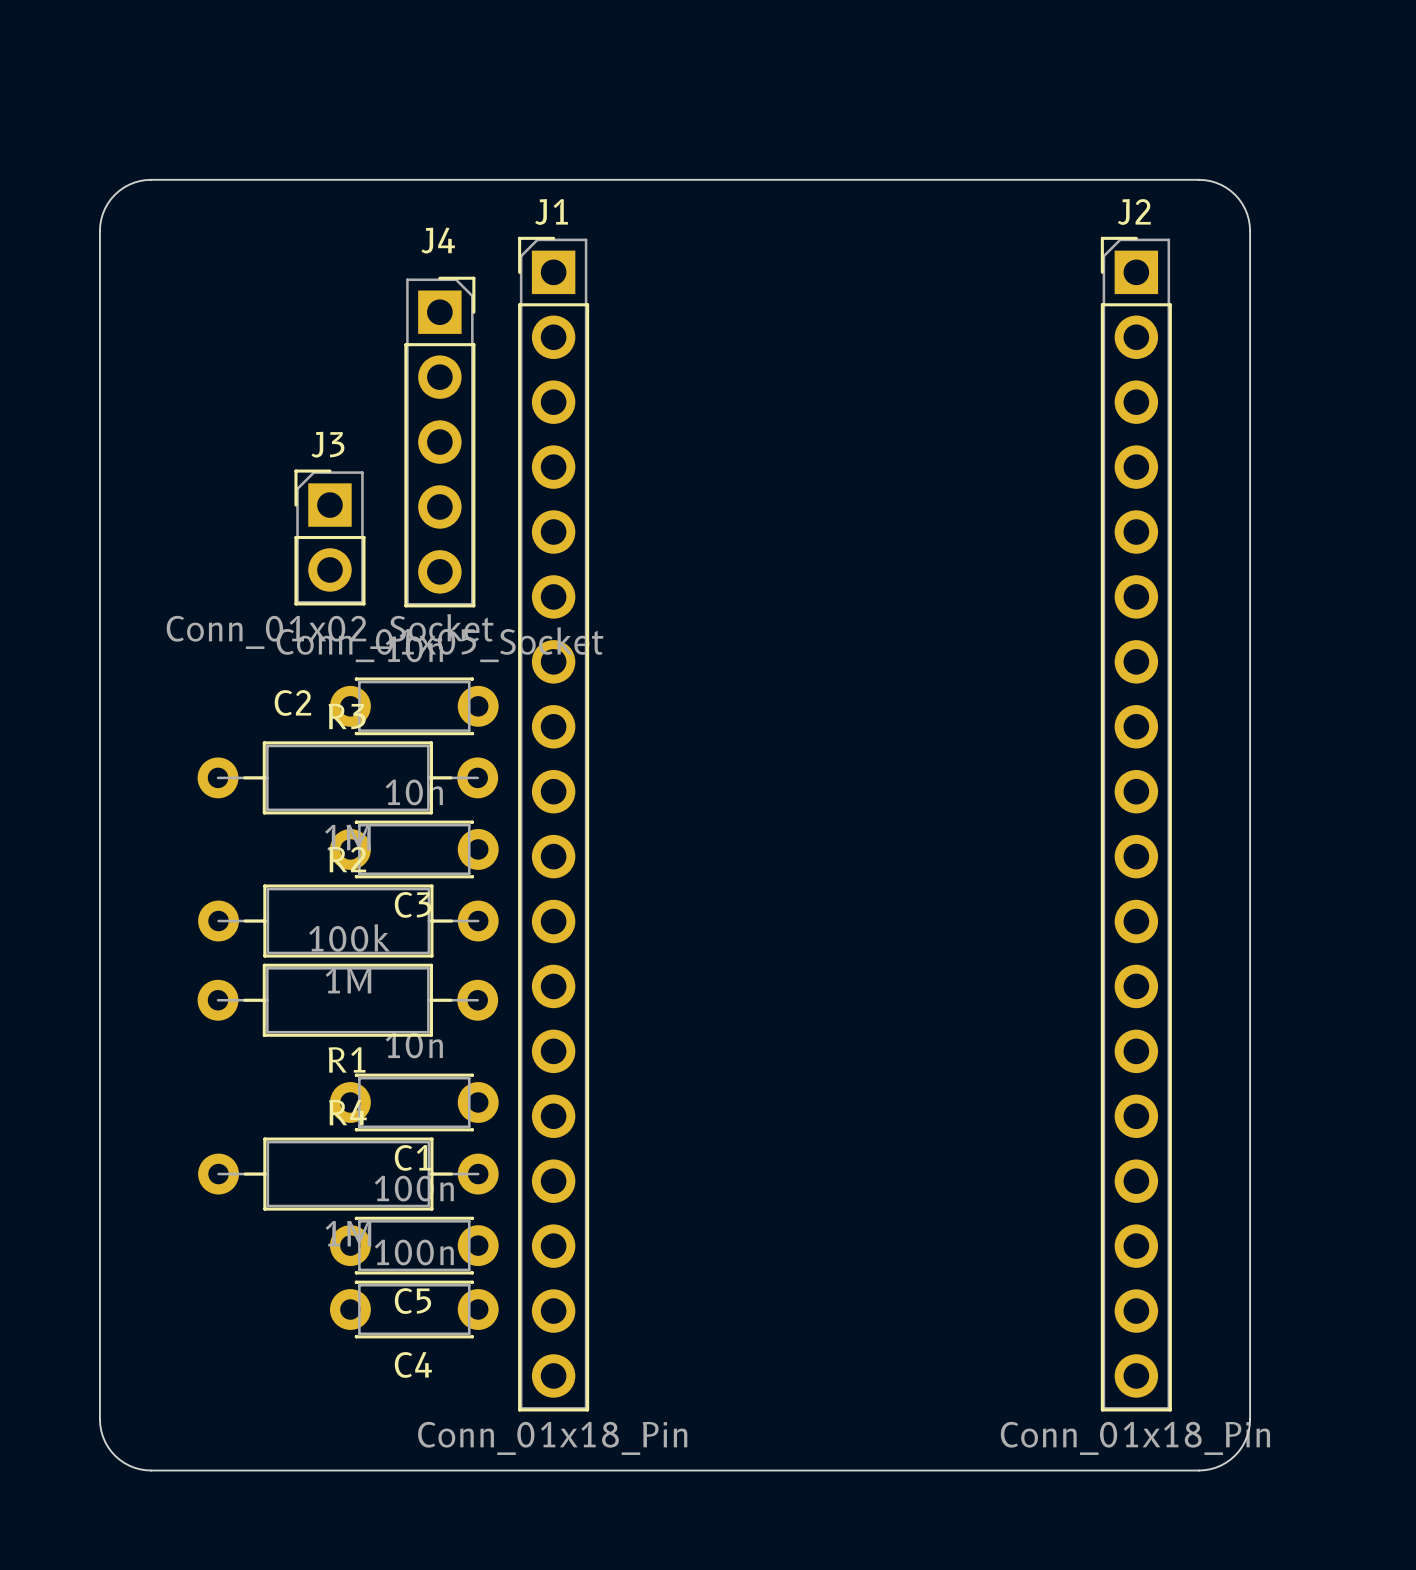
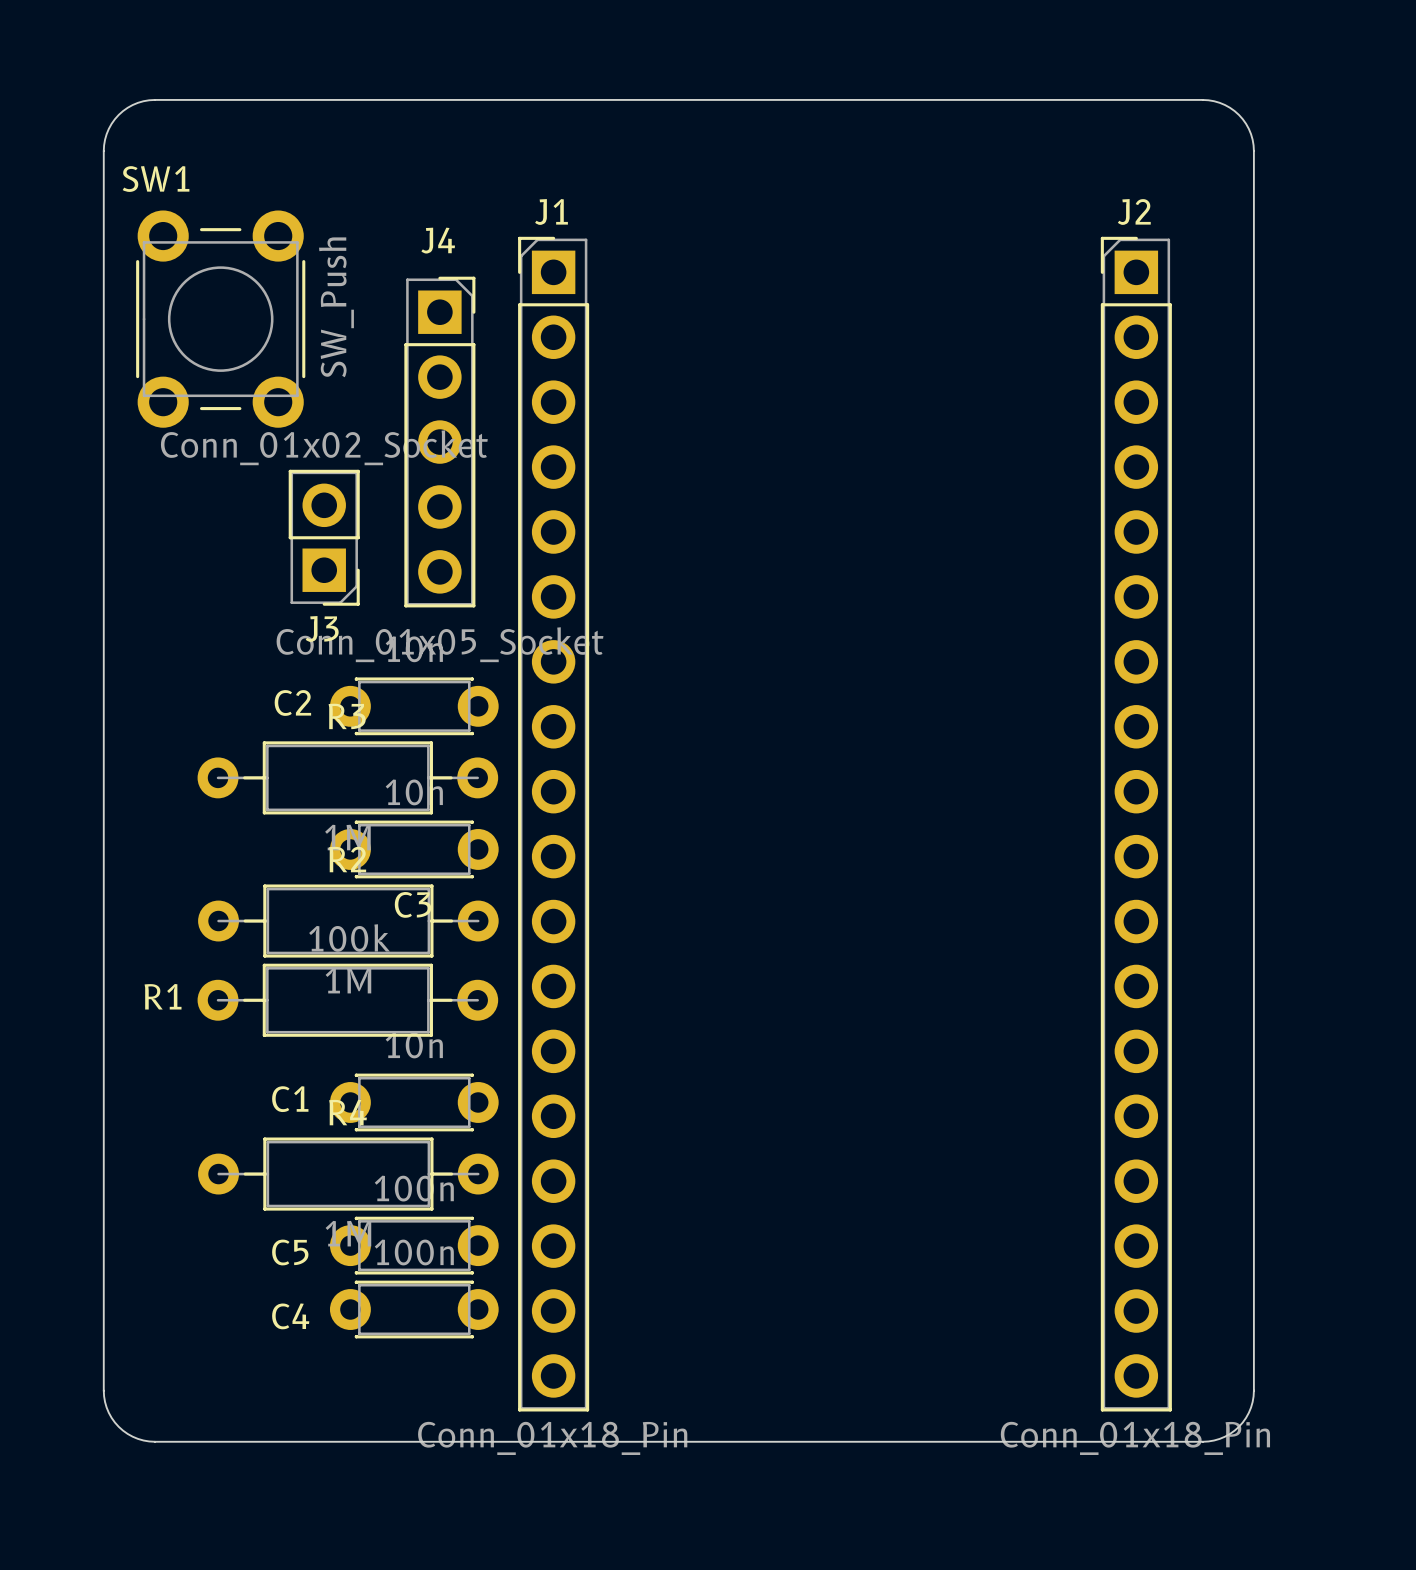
board edge: (151, 179) (1198, 179) (1221, 184) (1238, 199) (1247, 214) (1250, 230) (1250, 1419) (1245, 1441) (1230, 1459) (1215, 1467) (1198, 1470) (151, 1470) (128, 1465) (111, 1451) (102, 1436) (99, 1419) (99, 230) (102, 214) (114, 194) (134, 182) (151, 179) -> (154, 99) (138, 102) (118, 114) (106, 134) (103, 151) (103, 1390) (106, 1407) (114, 1422) (132, 1436) (154, 1441) (1202, 1441) (1219, 1438) (1234, 1430) (1248, 1412) (1253, 1390) (1253, 151) (1251, 134) (1242, 119) (1224, 105) (1202, 99) (154, 99)
SW1: none -> SW_Push (220, 319)
J3 rotation: 0° (329, 537) -> 180° (324, 537)
R1 name position: R1 (347, 1059) -> R1 (163, 996)
C1 name position: C1 (412, 1157) -> C1 (290, 1099)
C5 name position: C5 (412, 1301) -> C5 (290, 1252)
C4 name position: C4 (413, 1364) -> C4 (290, 1316)

